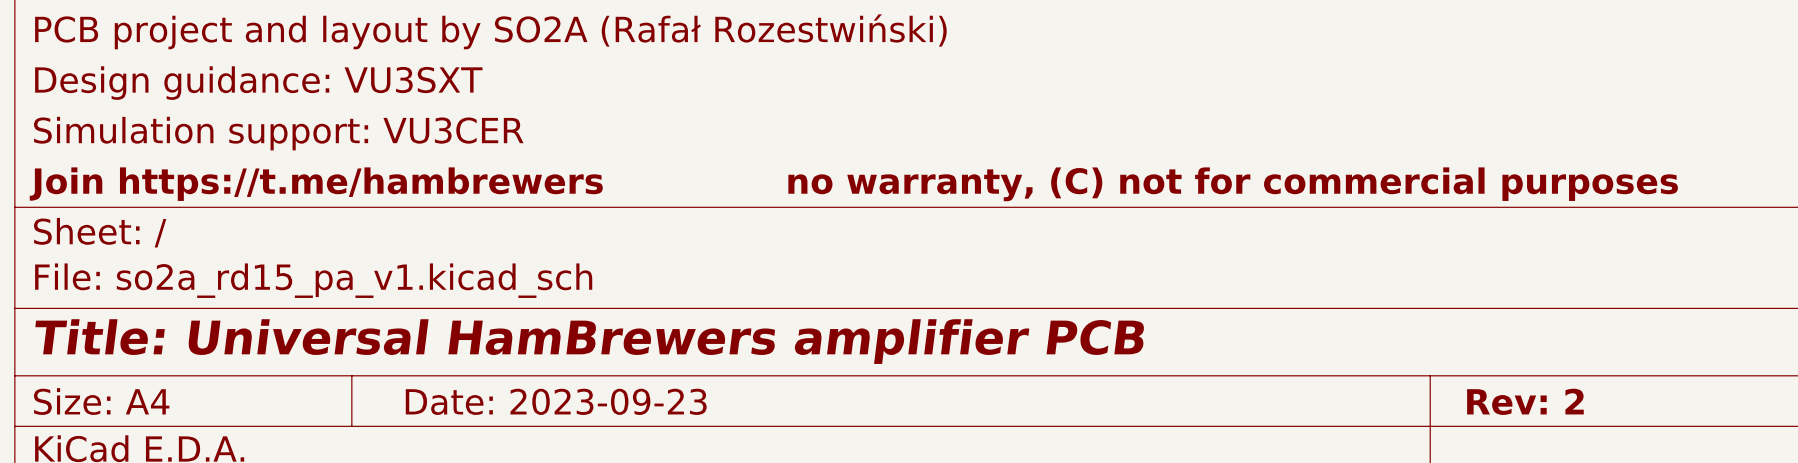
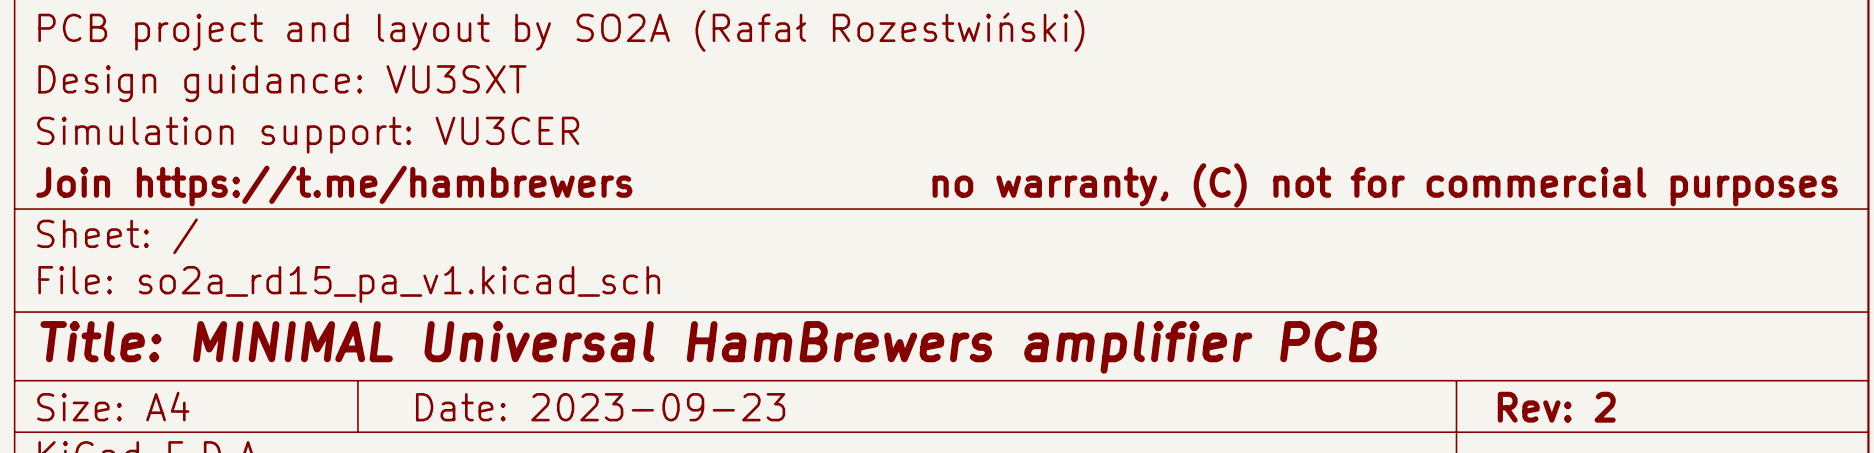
title block: Title: Universal HamBrewers amplifier PCB (589, 341) -> Title: MINIMAL Universal HamBrewers amplifier PCB (708, 347)

